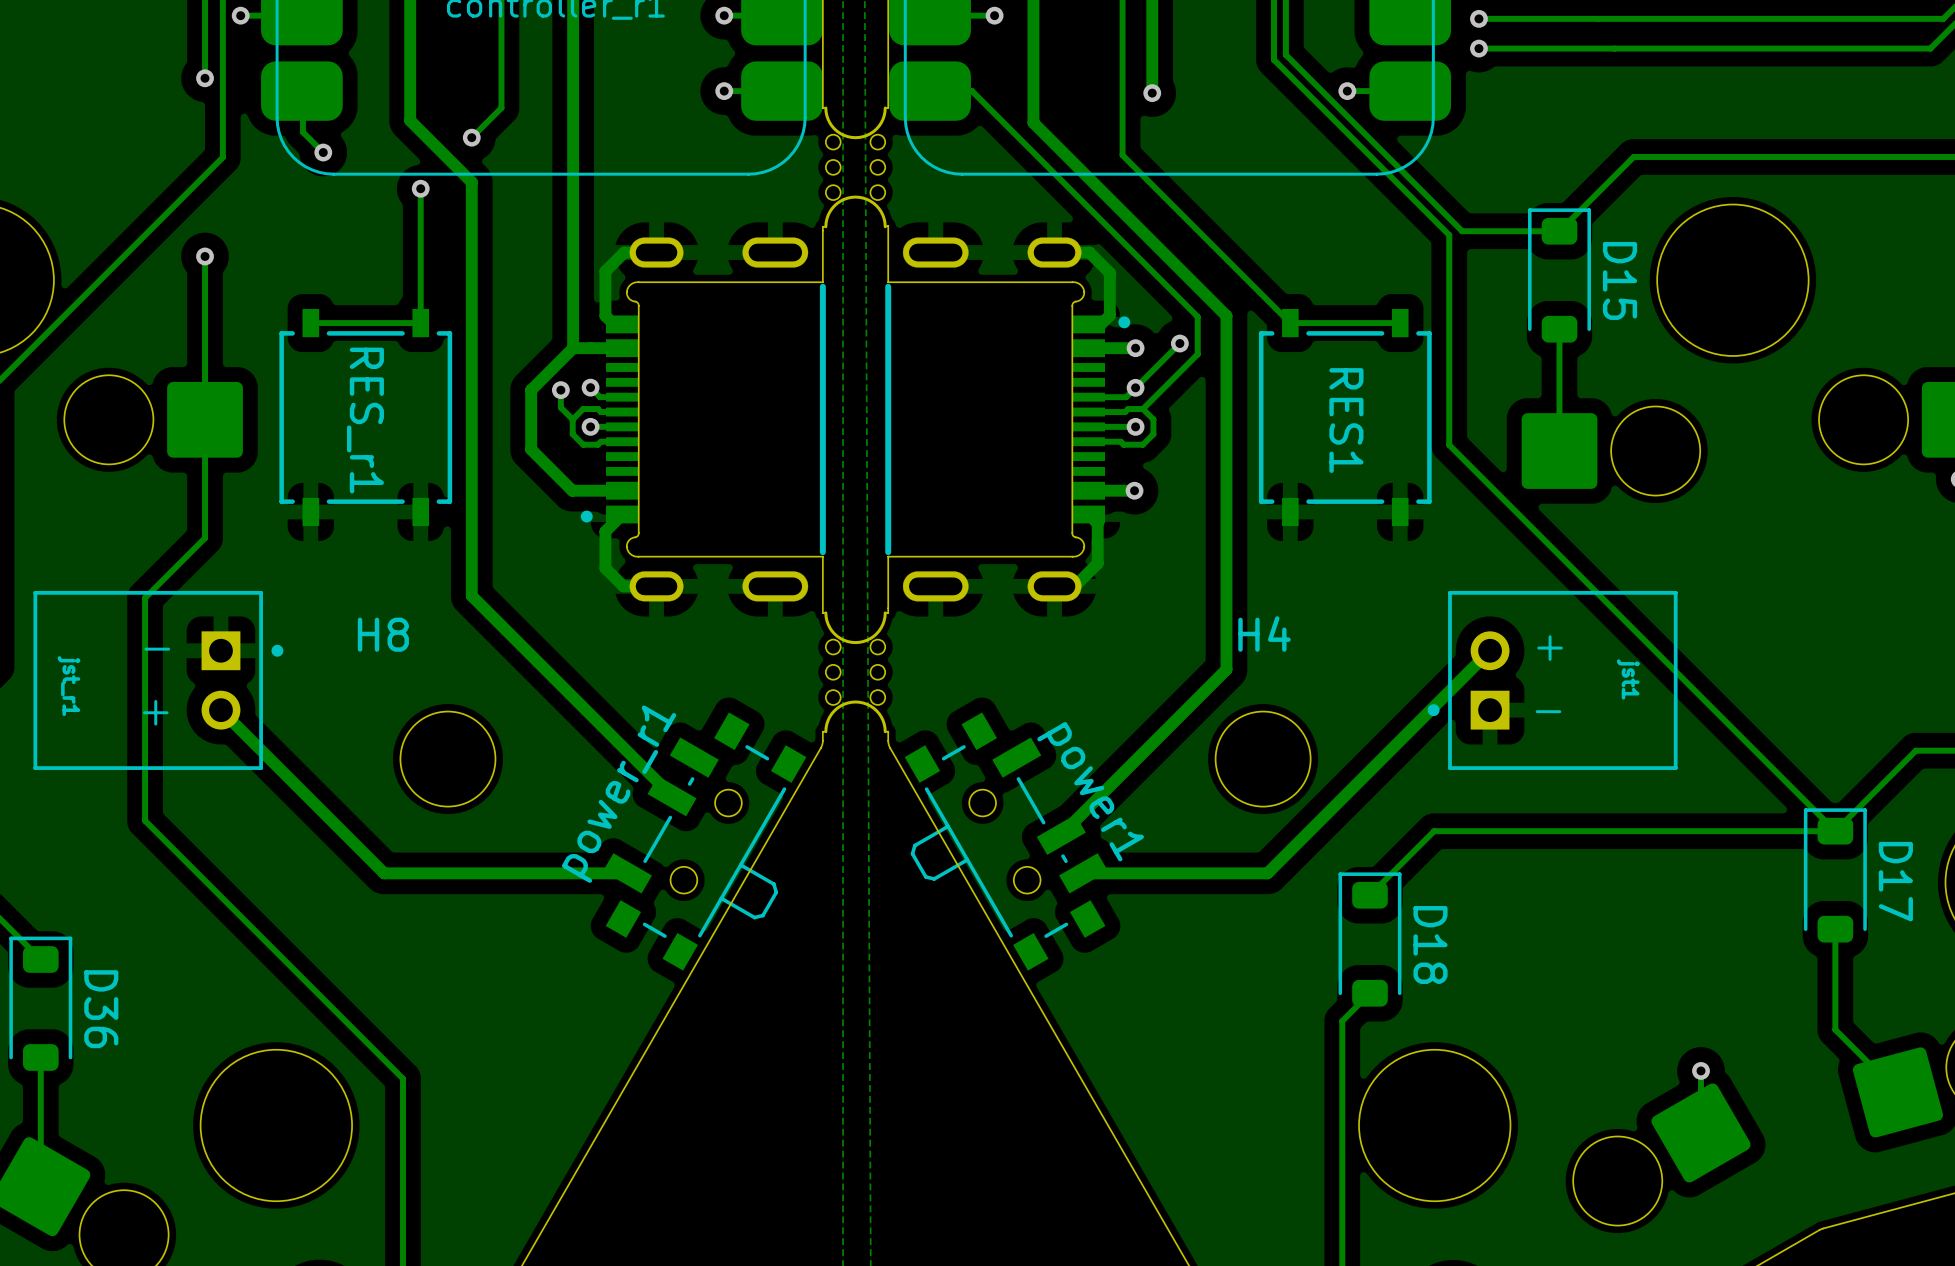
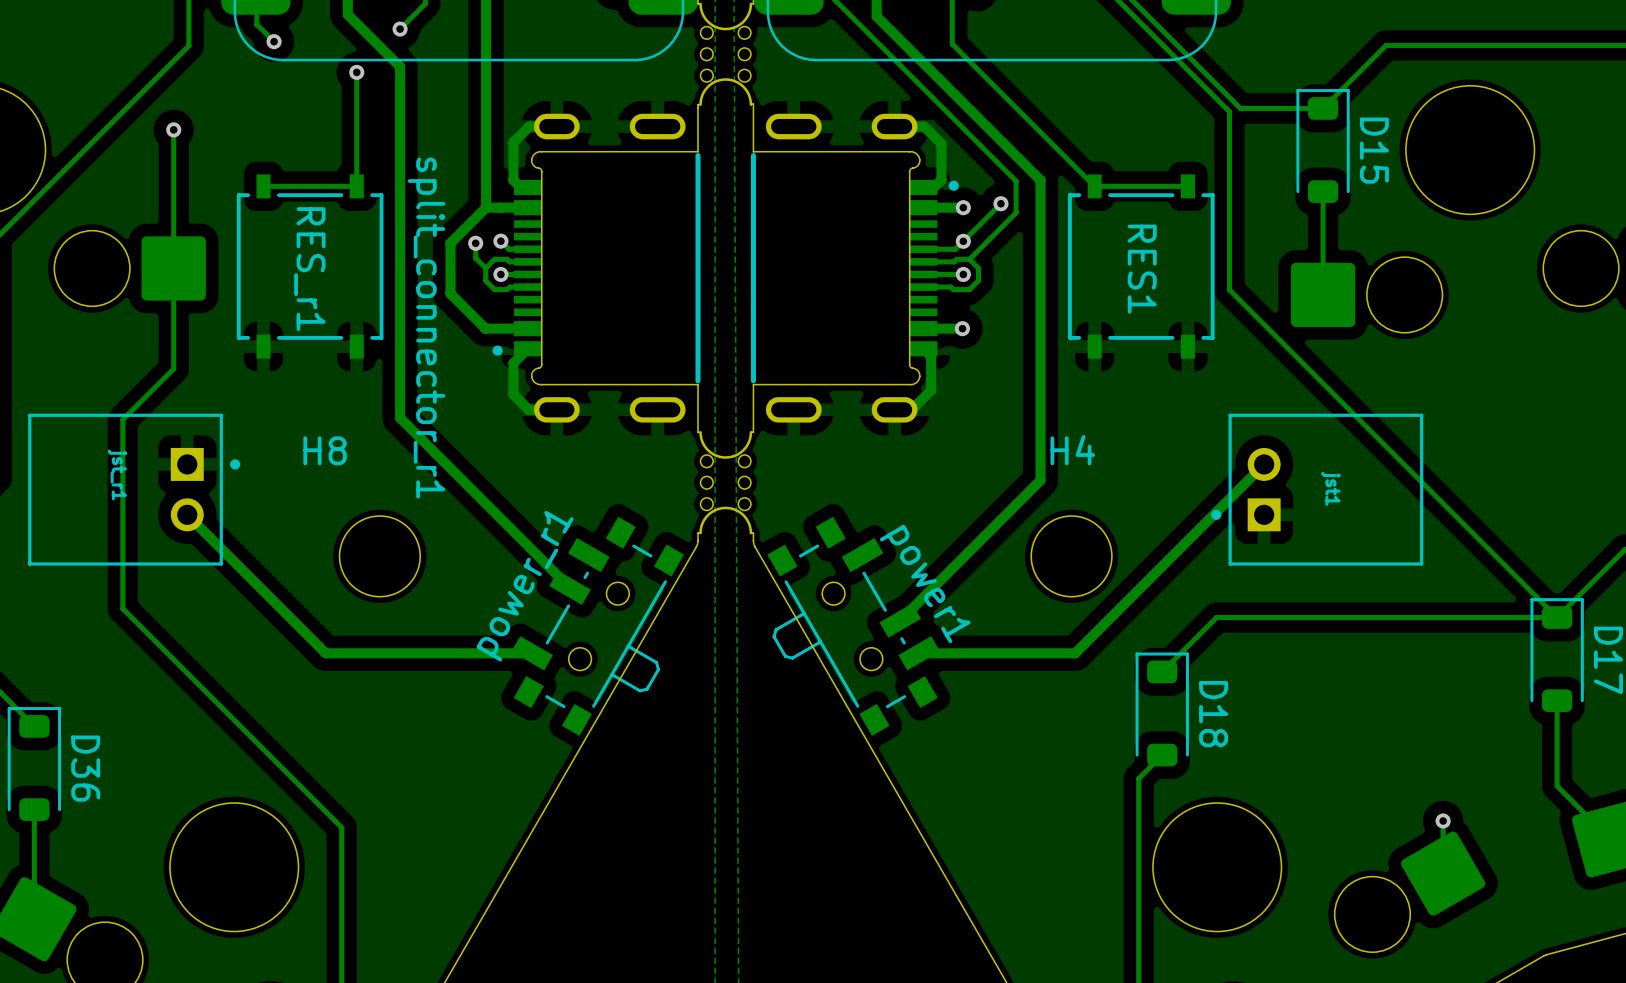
split_connector_r1 name: none -> split_connector_r1 (426, 328)
text: + (1550, 648) -> none
text: - (157, 649) -> none
jst1 name position: jst1 (1628, 679) -> jst1 (1330, 488)
jst_r1 name position: jst_r1 (68, 686) -> jst_r1 (117, 474)
text: - (1548, 711) -> none
text: + (155, 712) -> none

